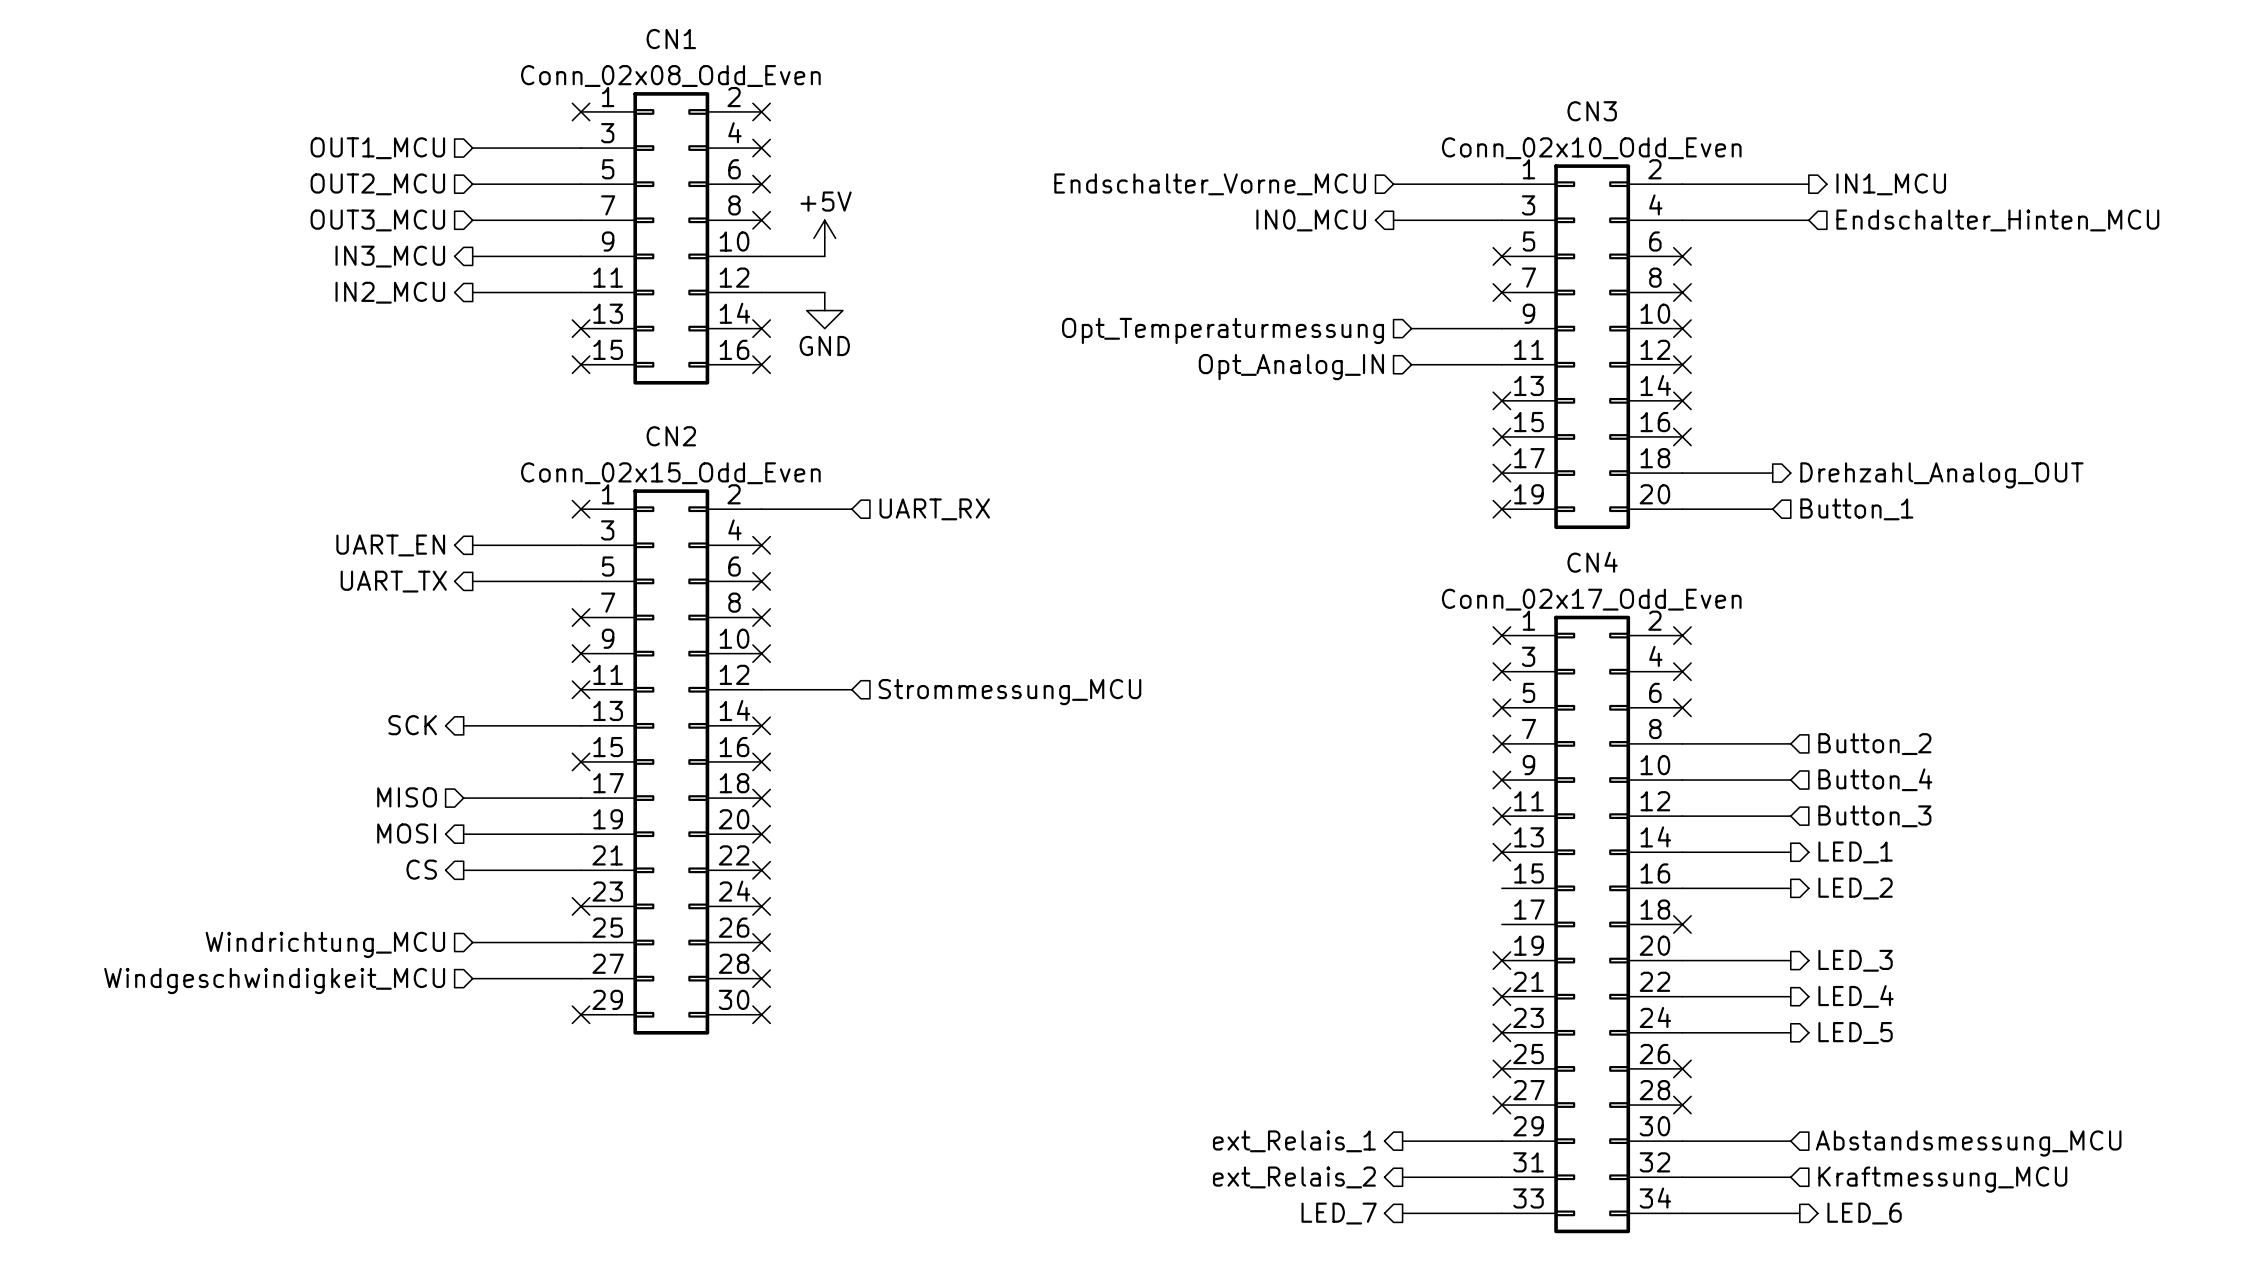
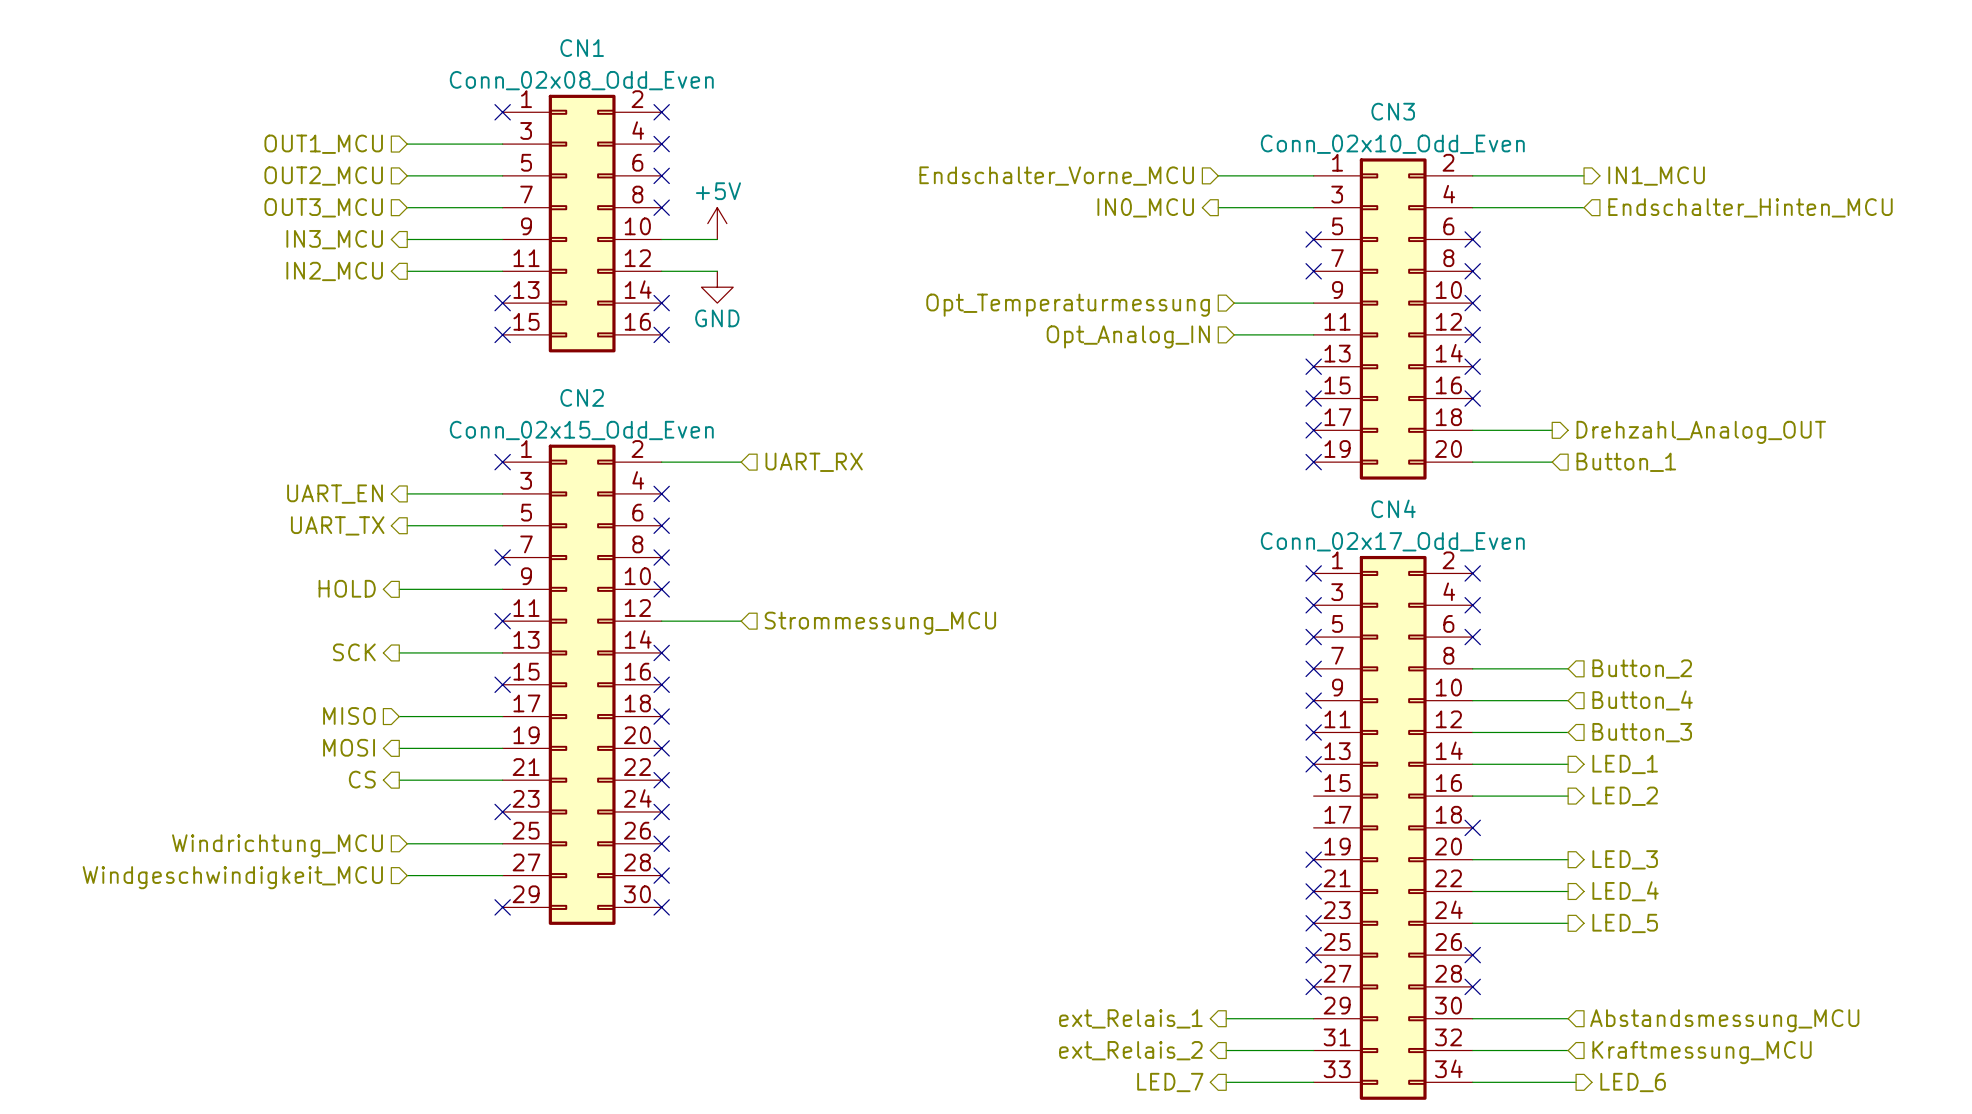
hierarchical label: none -> HOLD (347, 588)
wire: none -> (399, 589) (502, 589)
no-connect mark: (581, 653) -> none

